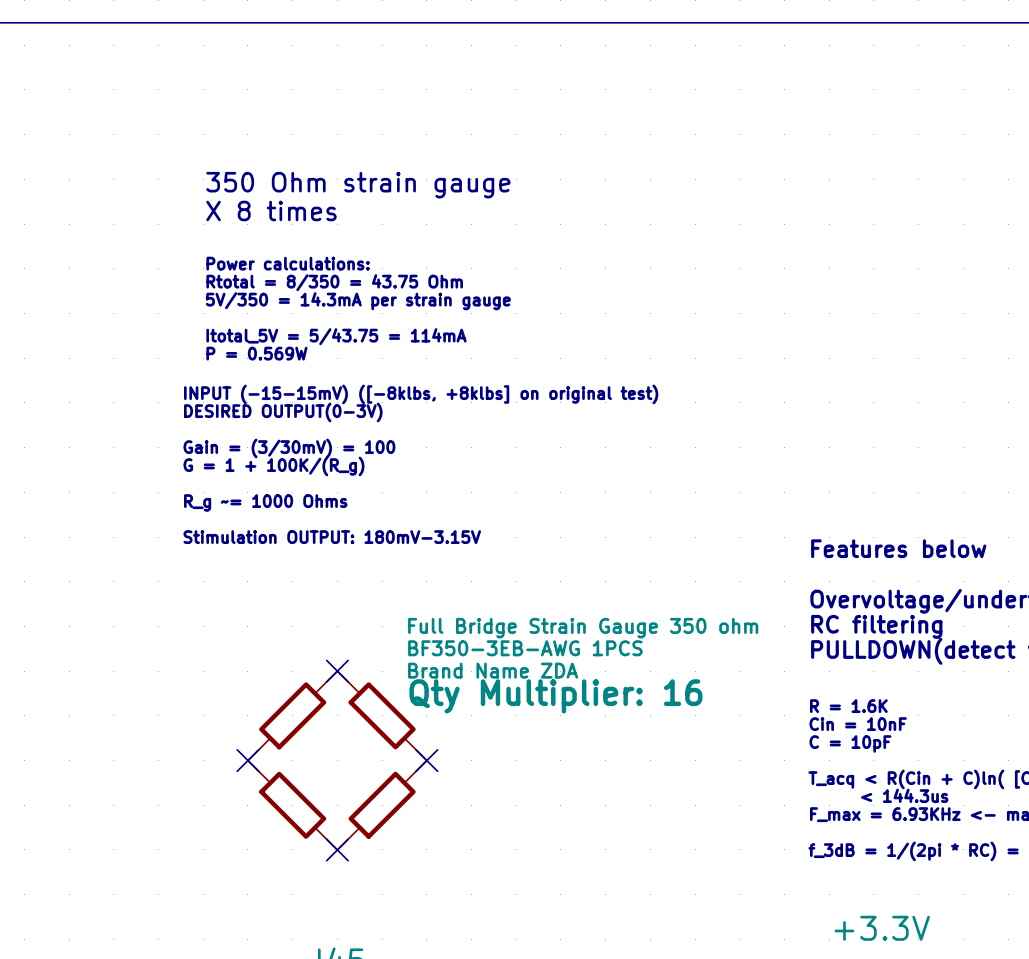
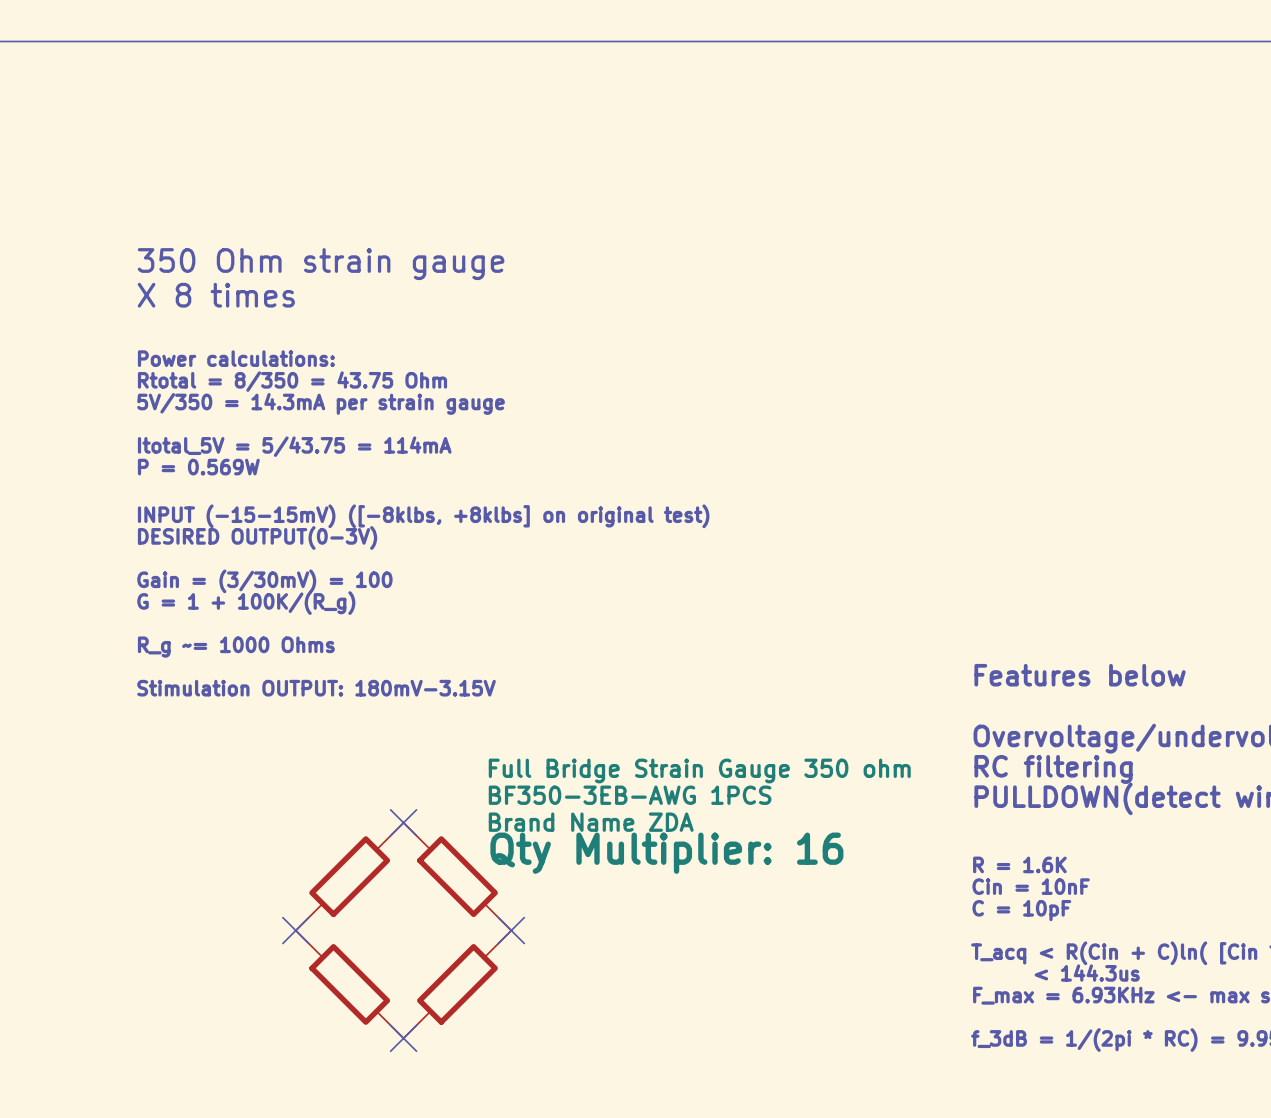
text position: 350 Ohm strain gauge (358, 185) -> 350 Ohm strain gauge (321, 264)
text position: X 8 times (271, 210) -> X 8 times (216, 295)
text position: Power calculations: (288, 263) -> Power calculations: (236, 358)
text position: Rtotal = 8/350 = 43.75 Ohm (334, 282) -> Rtotal = 8/350 = 43.75 Ohm (292, 381)
text position: 5V/350 = 14.3mA per strain gauge (358, 301) -> 5V/350 = 14.3mA per strain gauge (321, 403)
text position: Itotal_5V = 5/43.75 = 114mA (336, 336) -> Itotal_5V = 5/43.75 = 114mA (294, 446)
text position: P = 0.569W (256, 353) -> P = 0.569W (198, 467)
text position: INPUT (-15-15mV) ([-8klbs, +8klbs] on original test) (421, 394) -> INPUT (-15-15mV) ([-8klbs, +8klbs] on original test) (423, 516)
text position: DESIRED OUTPUT(0-3V) (283, 412) -> DESIRED OUTPUT(0-3V) (257, 537)
text position: Gain = (3/30mV) = 100 (289, 448) -> Gain = (3/30mV) = 100 (264, 581)
text position: G = 1 + 100K/(R_g) (273, 466) -> G = 1 + 100K/(R_g) (246, 603)
text position: R_g ~= 1000 Ohms (265, 502) -> R_g ~= 1000 Ohms (236, 647)
text position: Stimulation OUTPUT: 180mV-3.15V (332, 537) -> Stimulation OUTPUT: 180mV-3.15V (316, 688)

